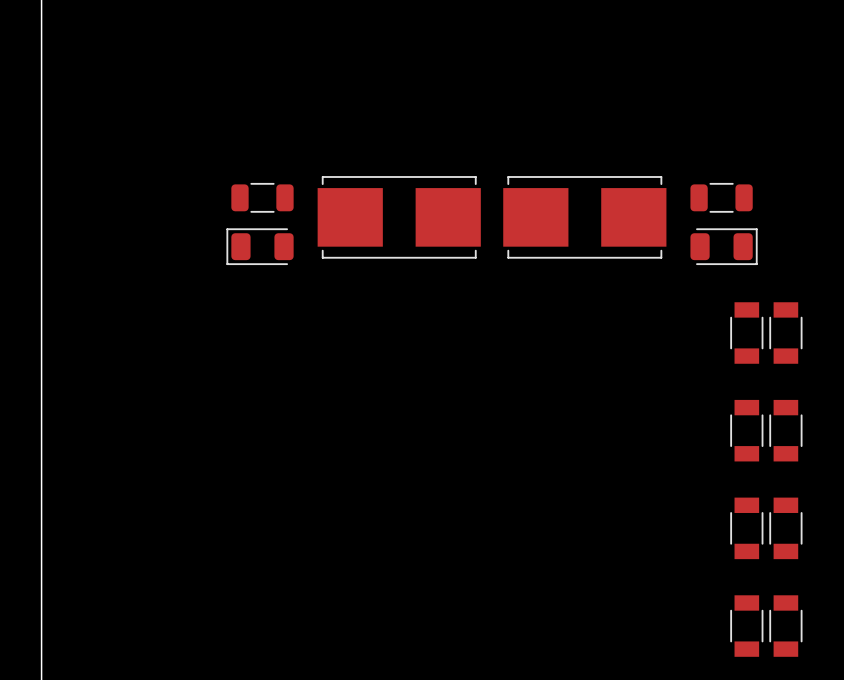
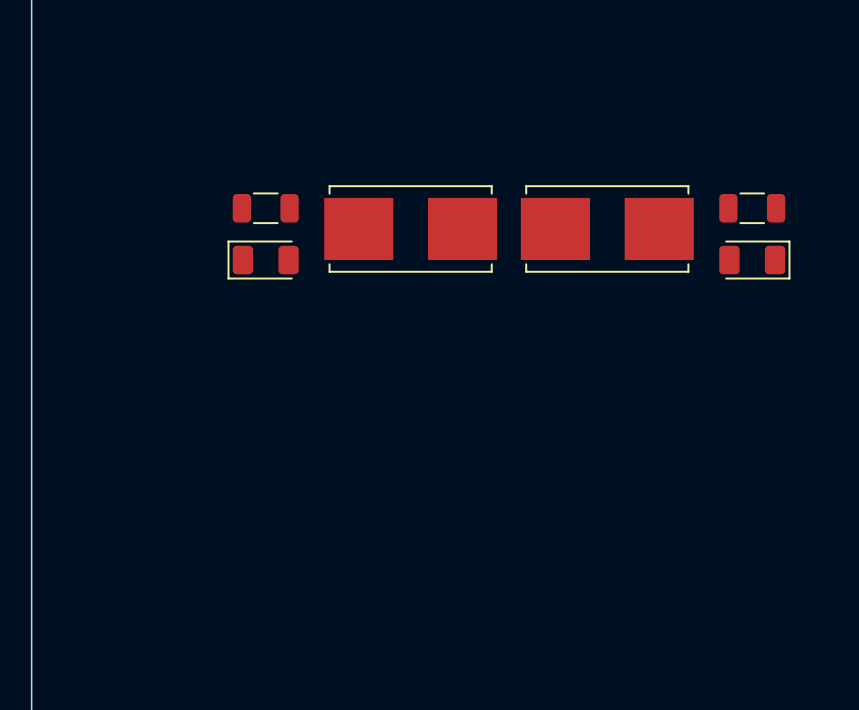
part: (746, 333) -> none
part: (785, 333) -> none
part: (746, 430) -> none
part: (785, 430) -> none
part: (746, 528) -> none
part: (785, 528) -> none
part: (746, 626) -> none
part: (785, 626) -> none

